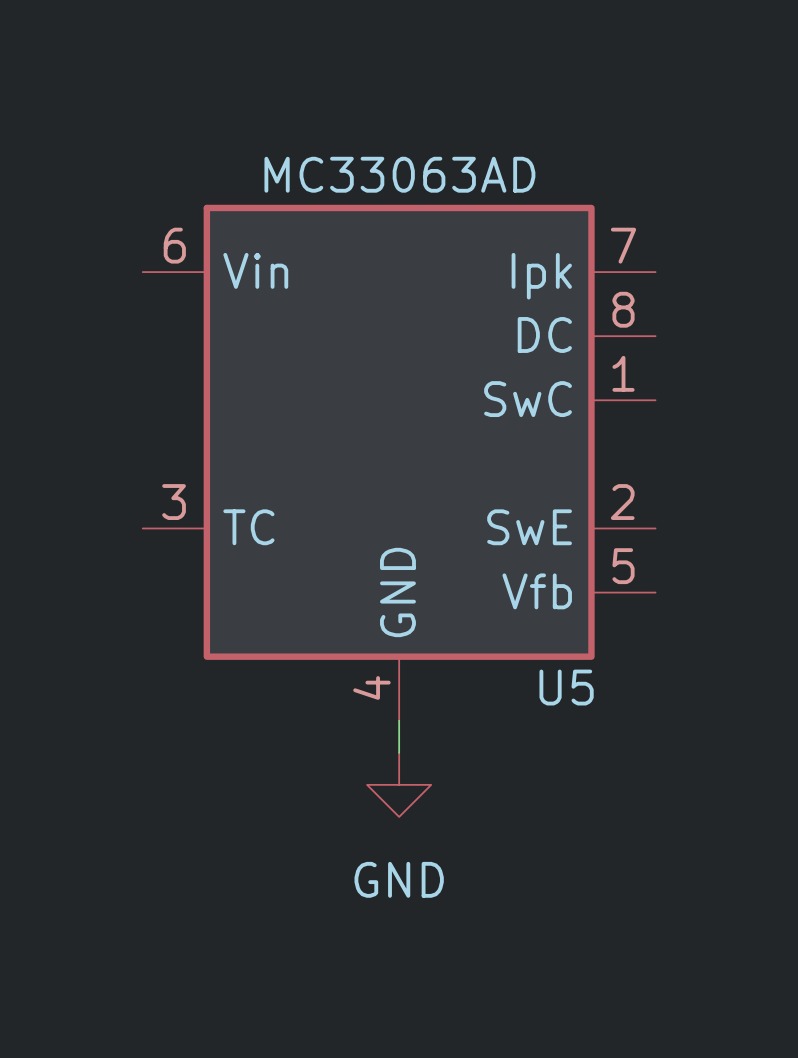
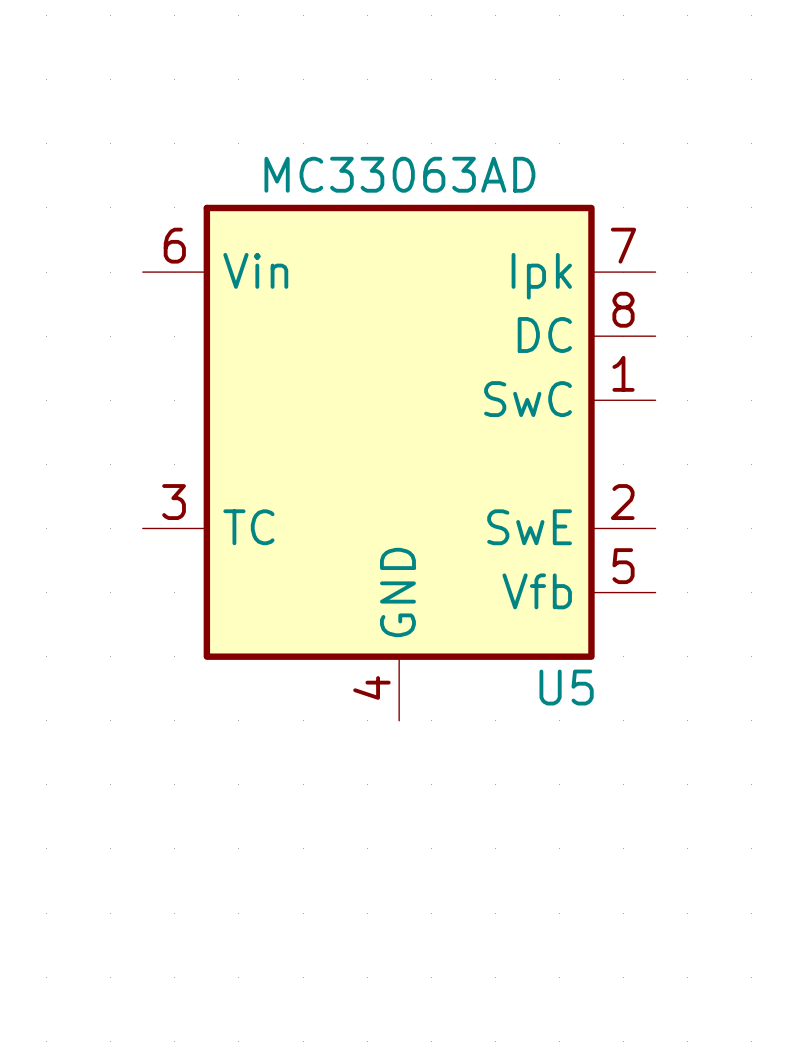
wire: (399, 720) (399, 752) -> none
power symbol: GND (399, 784) -> none

